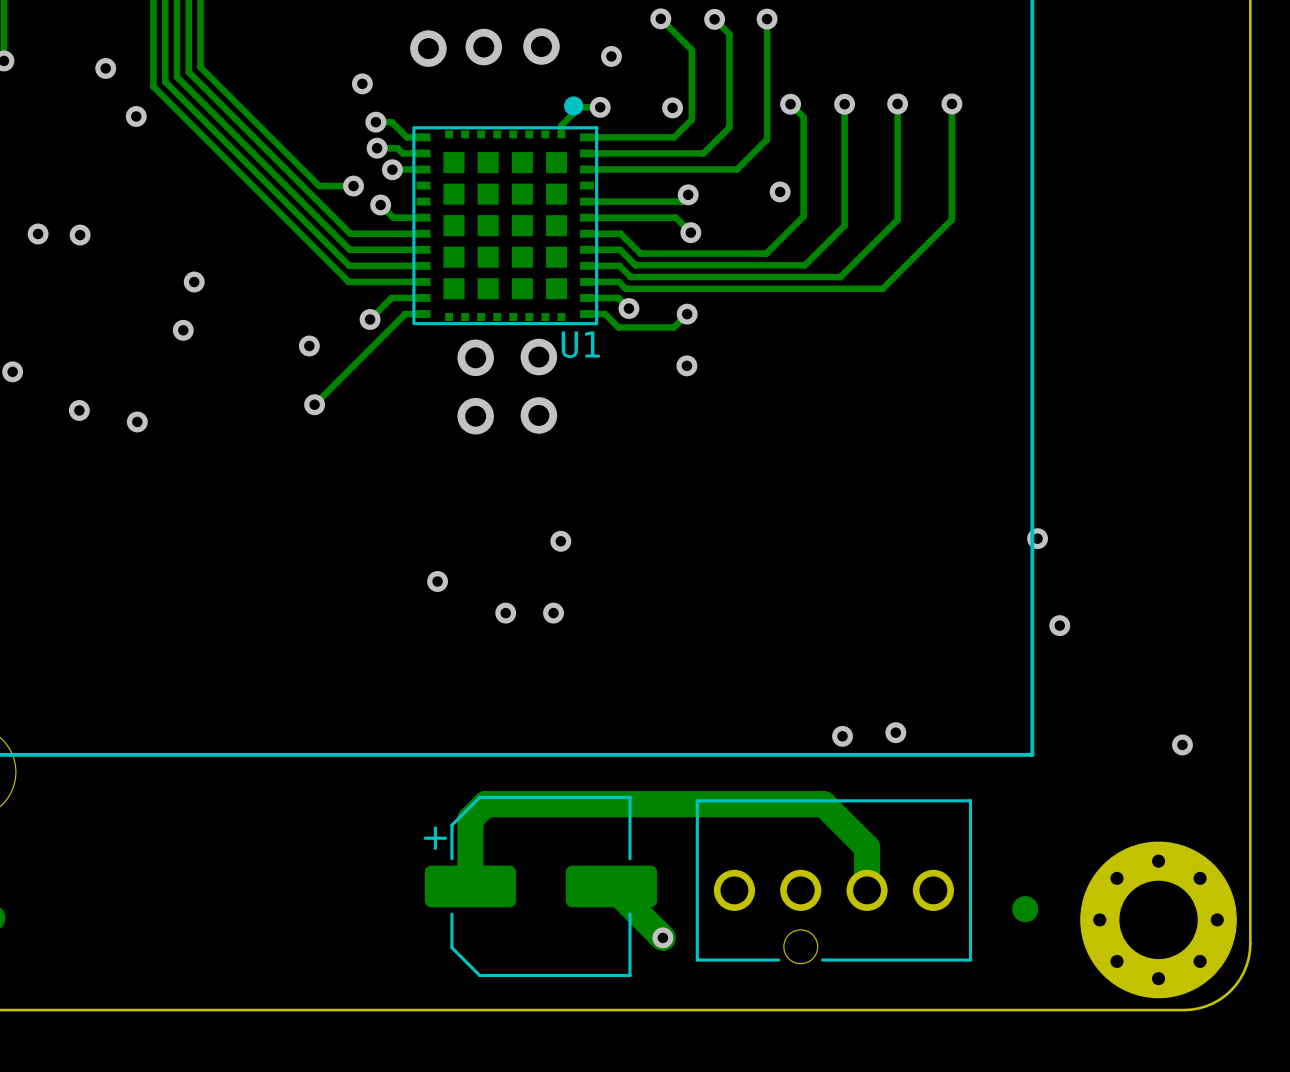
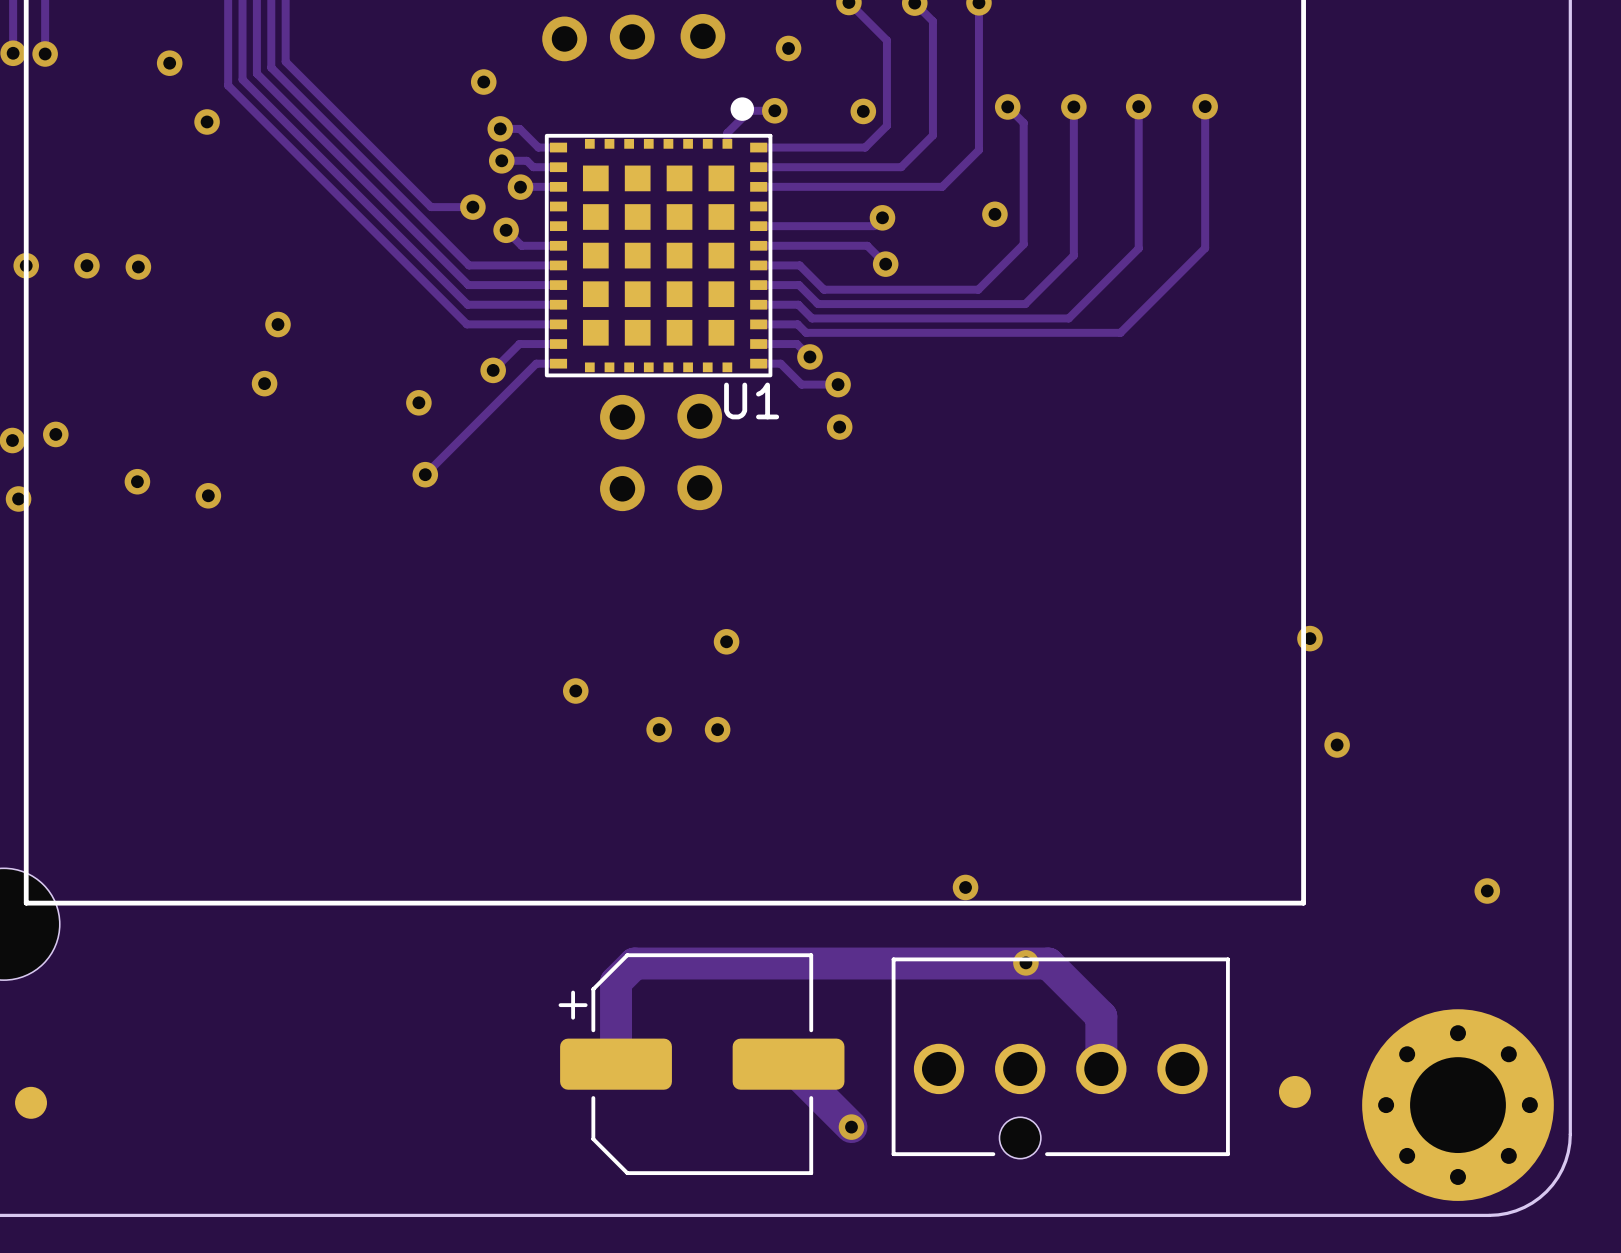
track: (686, 313) (673, 327) (618, 327) -> (838, 384) (801, 384) (797, 380)
via: (687, 314) -> none
via: none -> (838, 384)
via: none -> (839, 427)
via: (686, 365) -> none
via: (895, 732) -> none
via: (842, 736) -> none
via: none -> (965, 887)
via: none -> (1025, 962)

